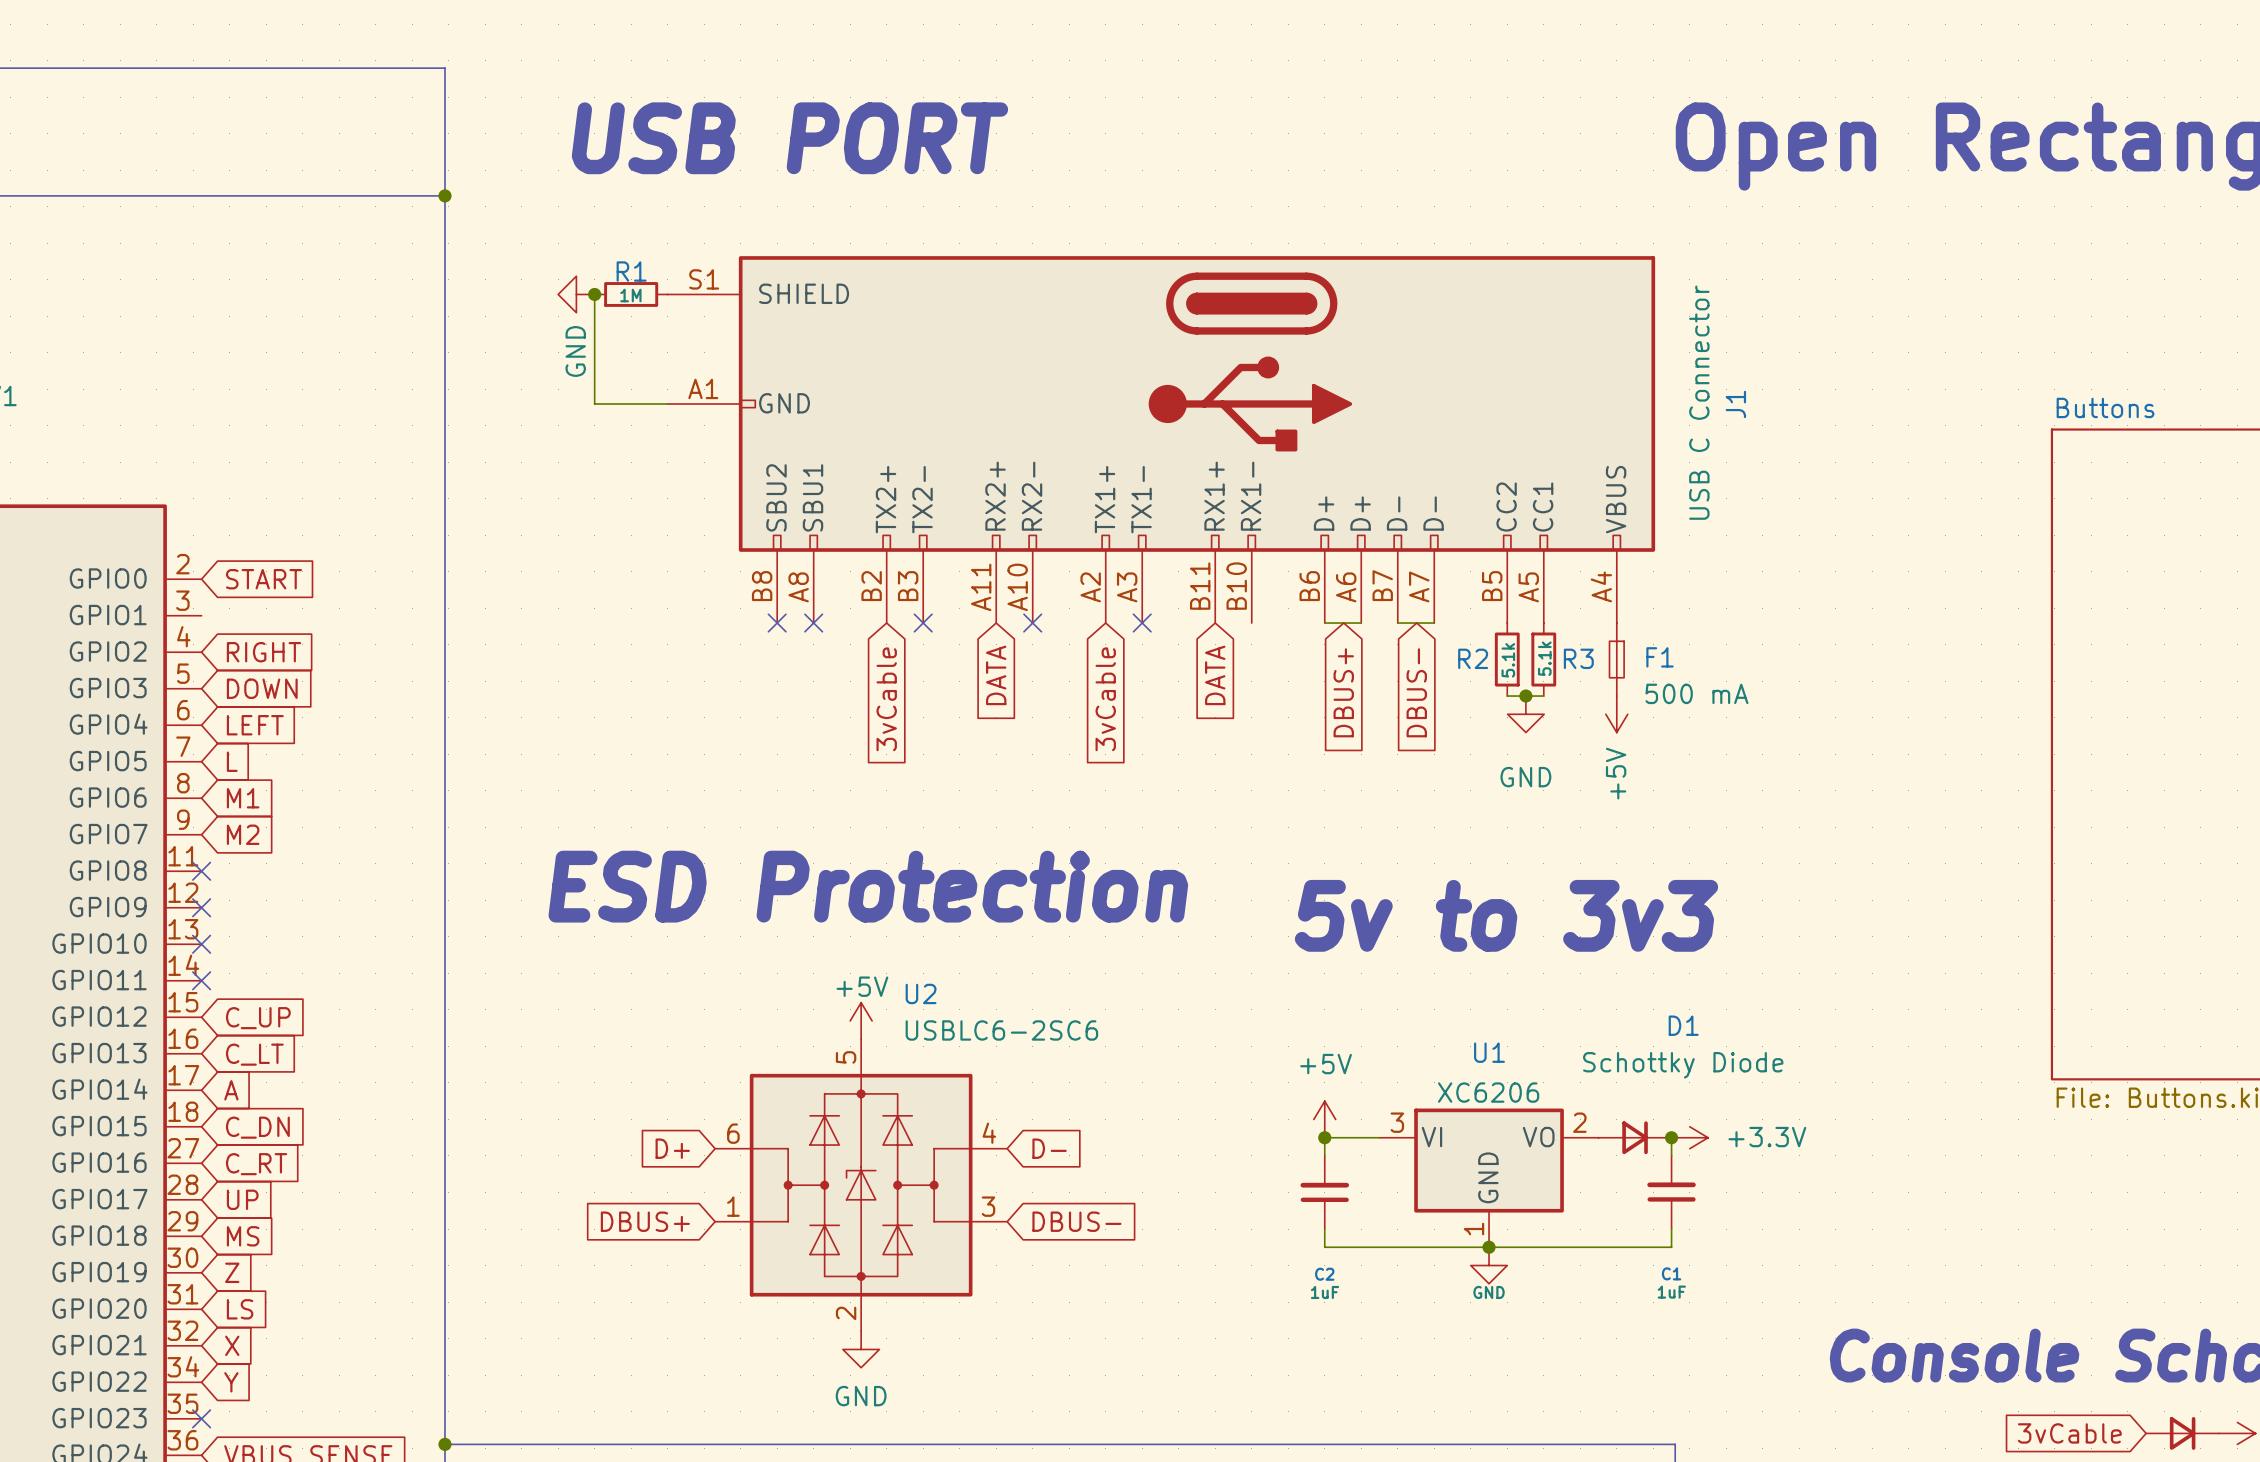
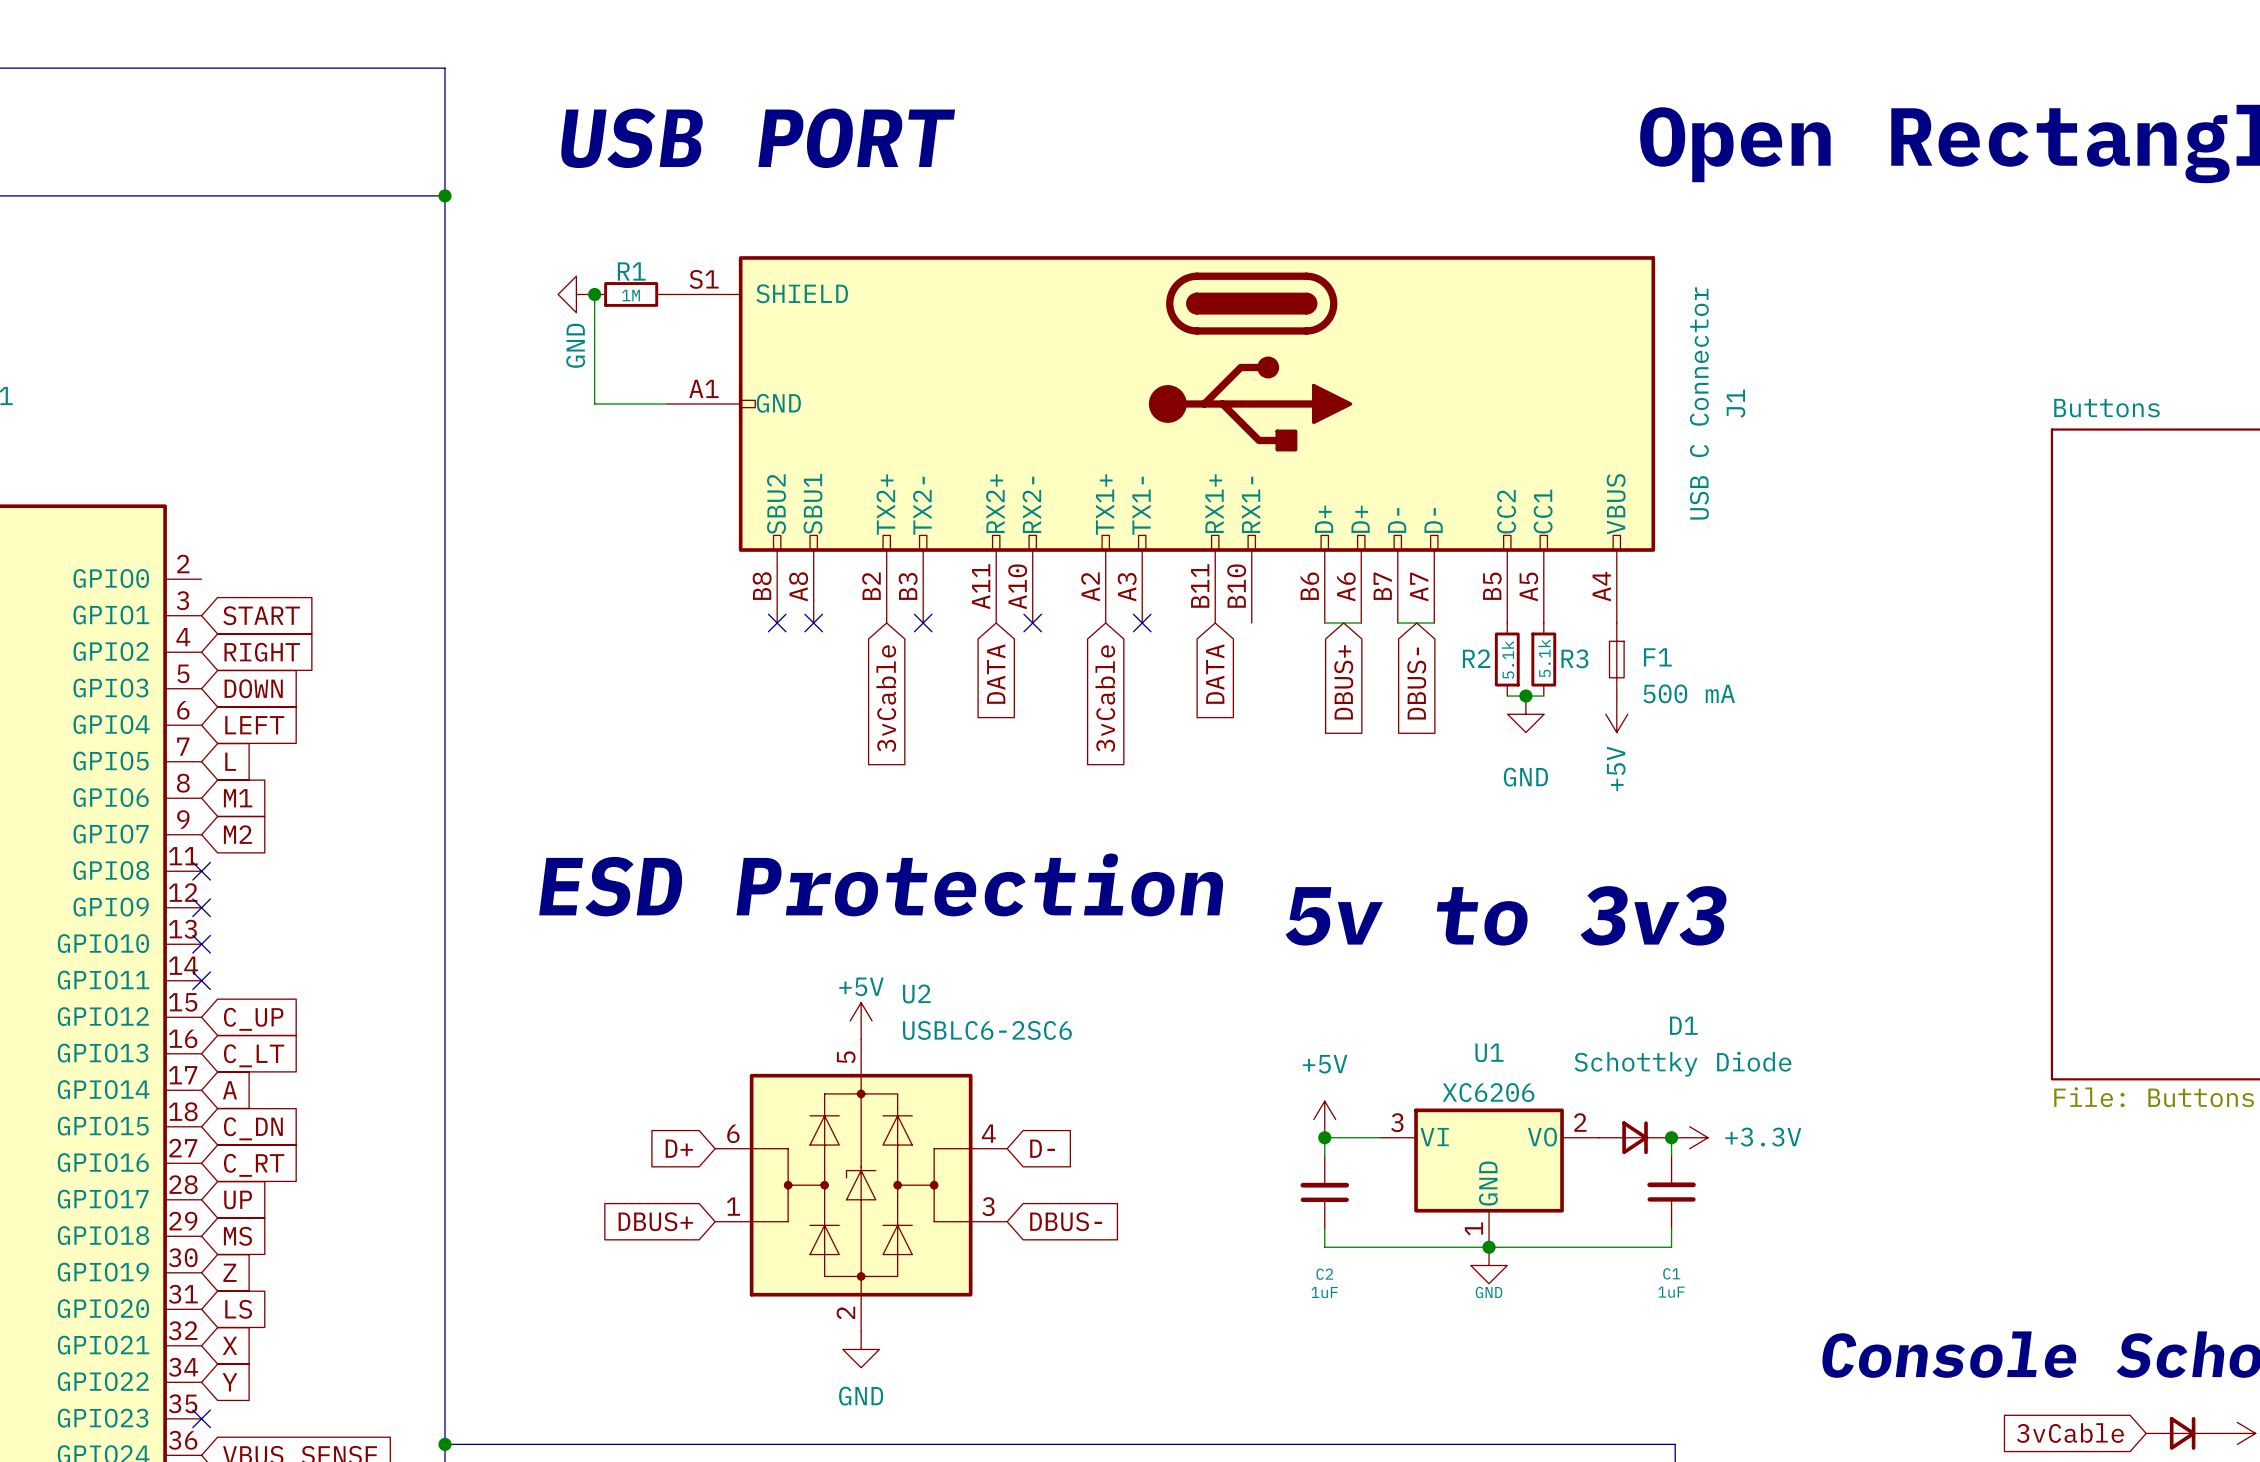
global label position: START (263, 579) -> START (261, 615)

